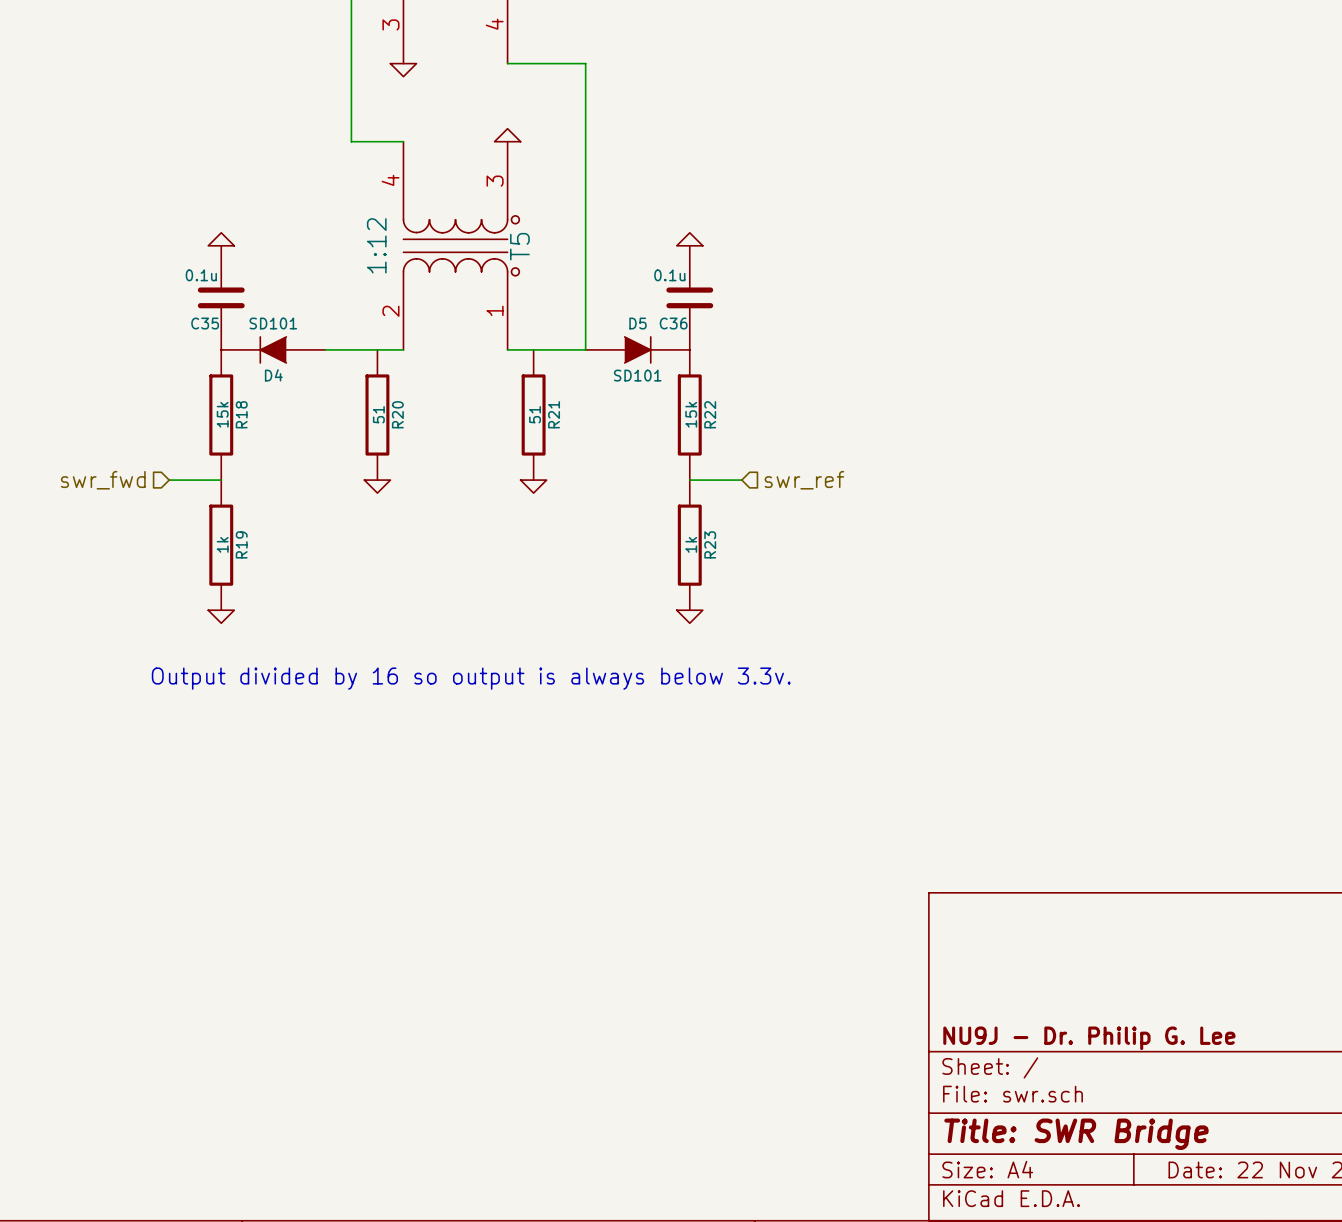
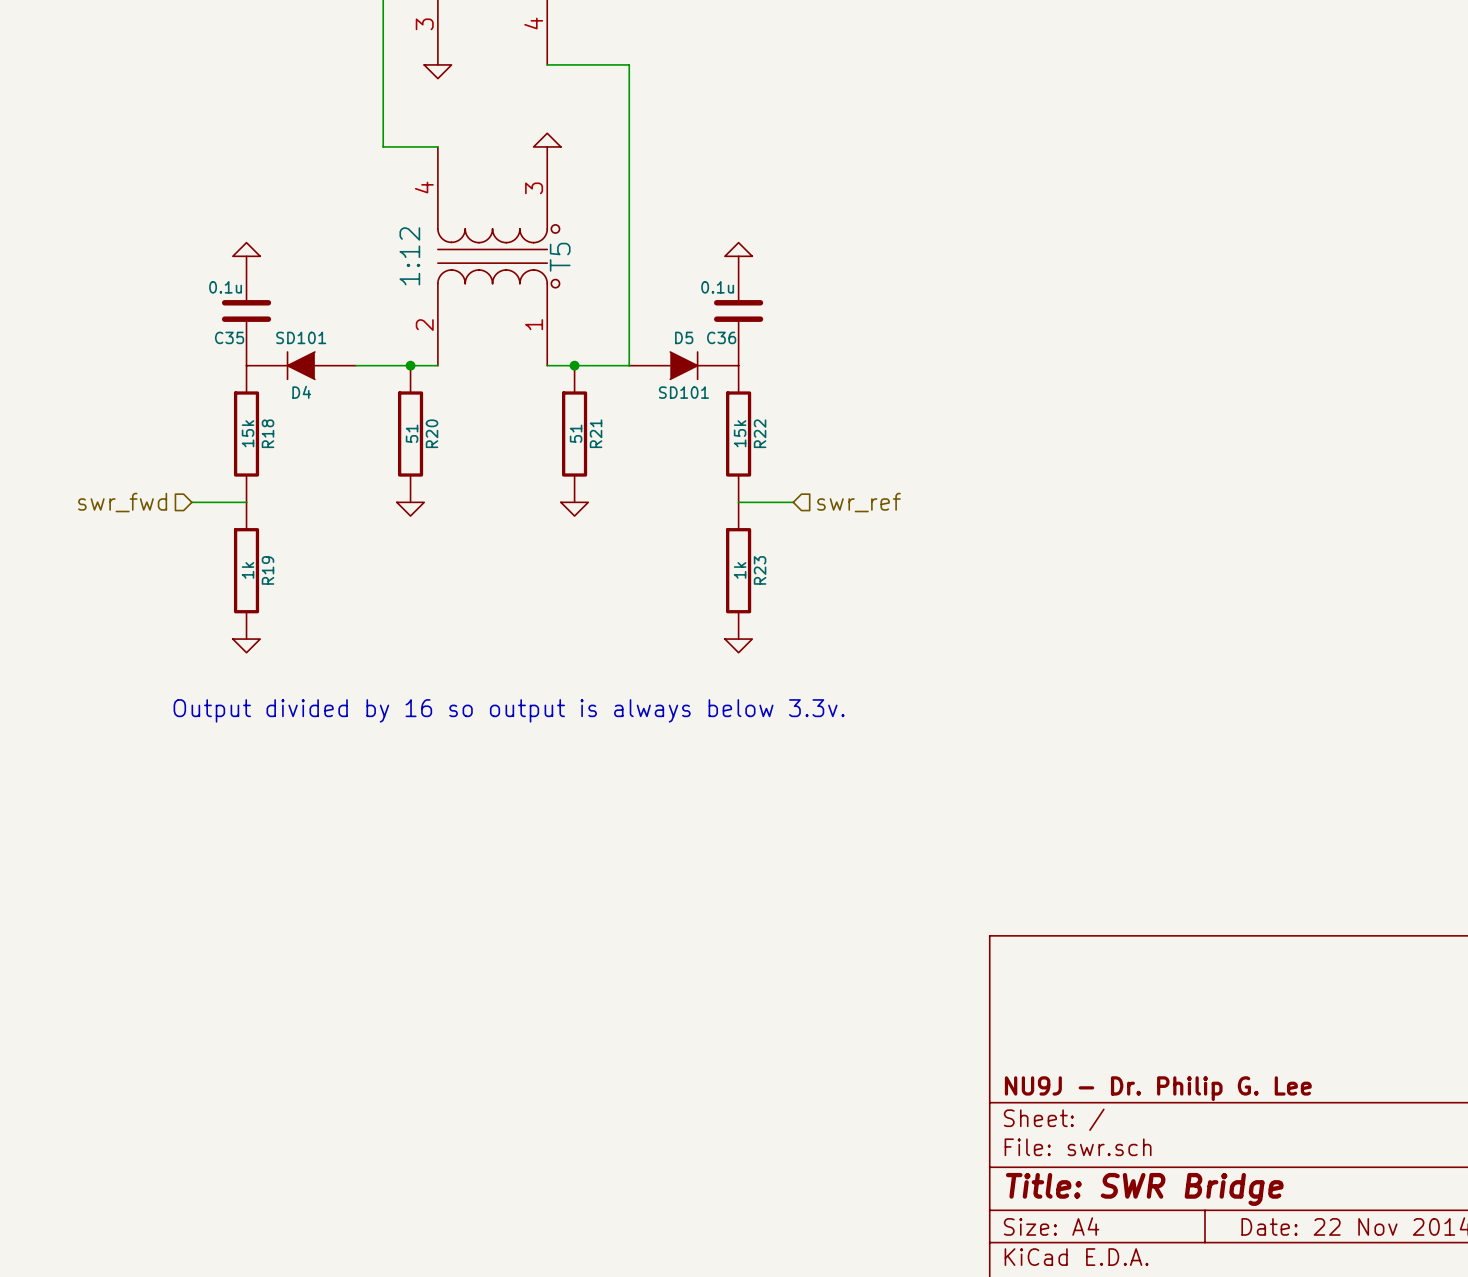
junction: none -> (410, 365)
junction: none -> (574, 365)

